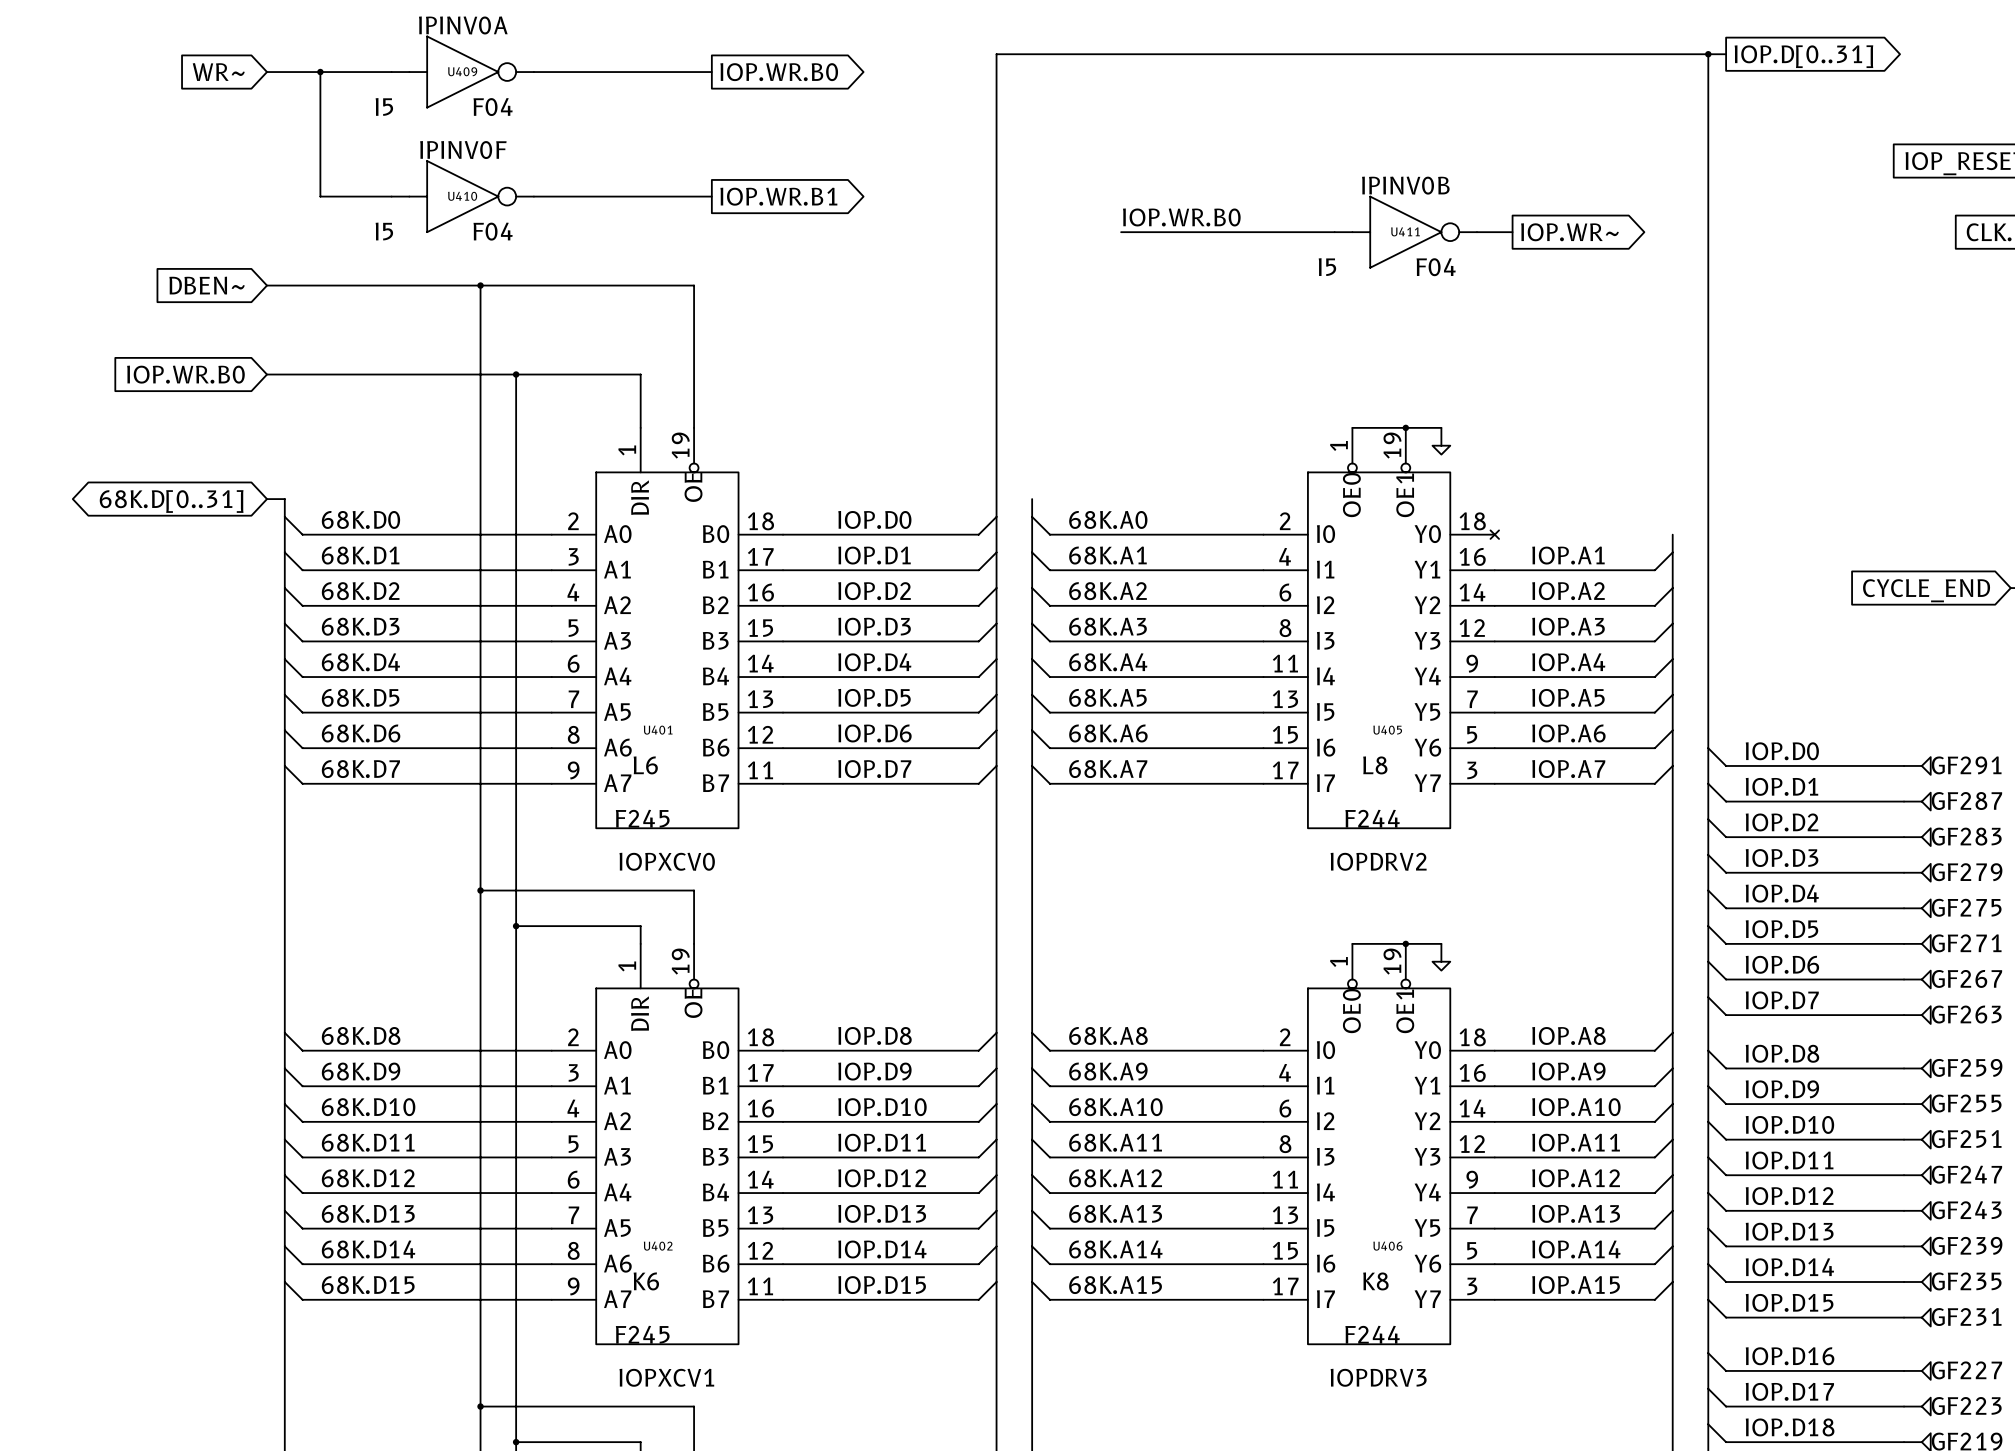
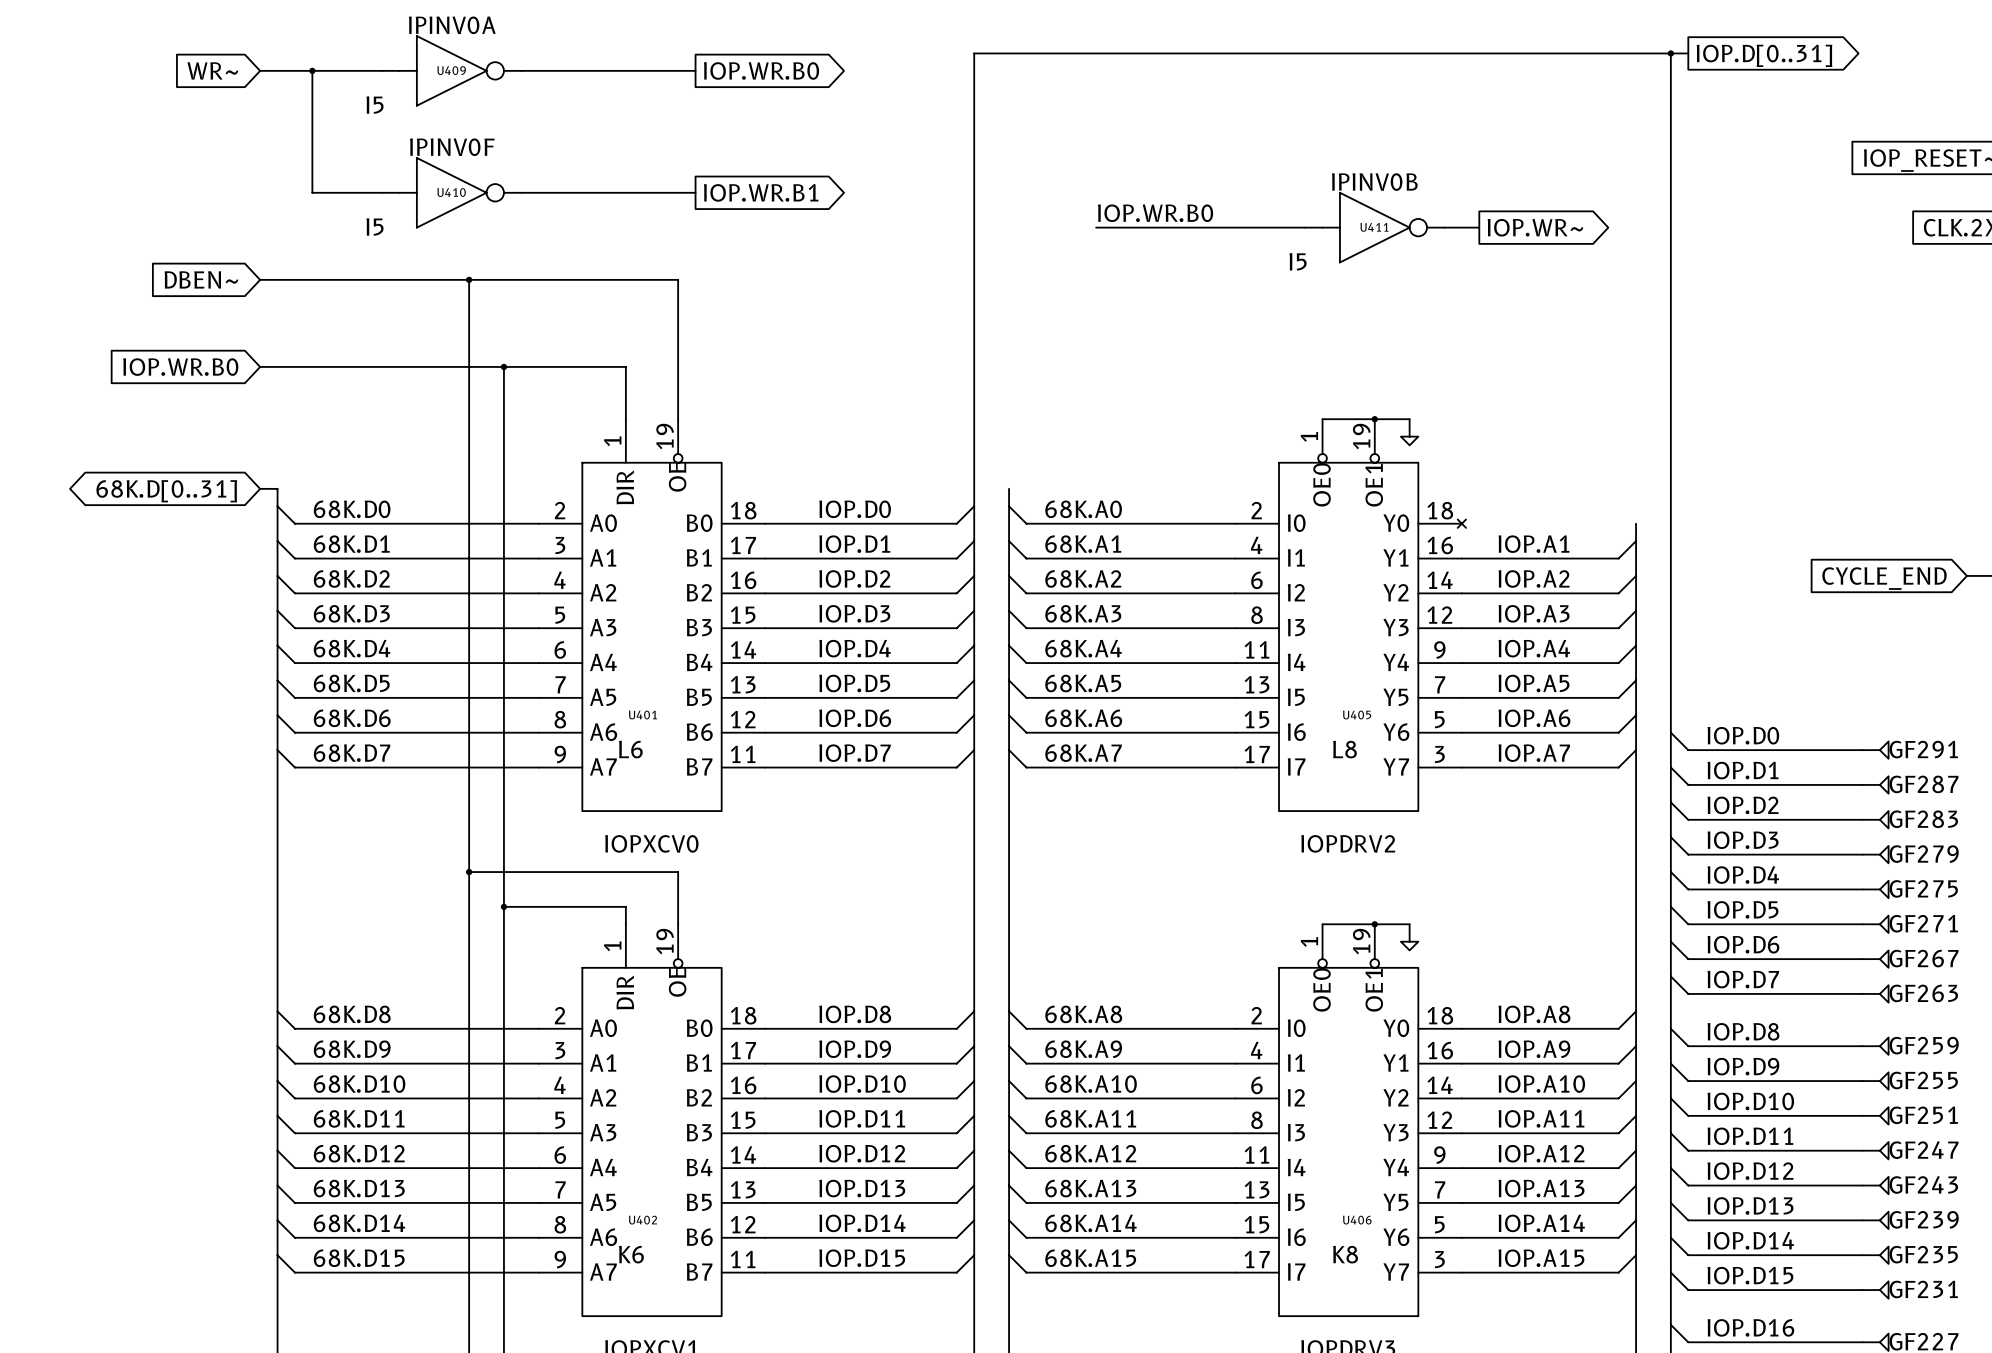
U409 value: F04 (493, 107) -> none
U410 value: F04 (493, 231) -> none
U411 value: F04 (1436, 267) -> none
U401 value: F245 (642, 818) -> none
U405 value: F244 (1372, 818) -> none
U402 value: F245 (642, 1334) -> none
U406 value: F244 (1372, 1334) -> none

